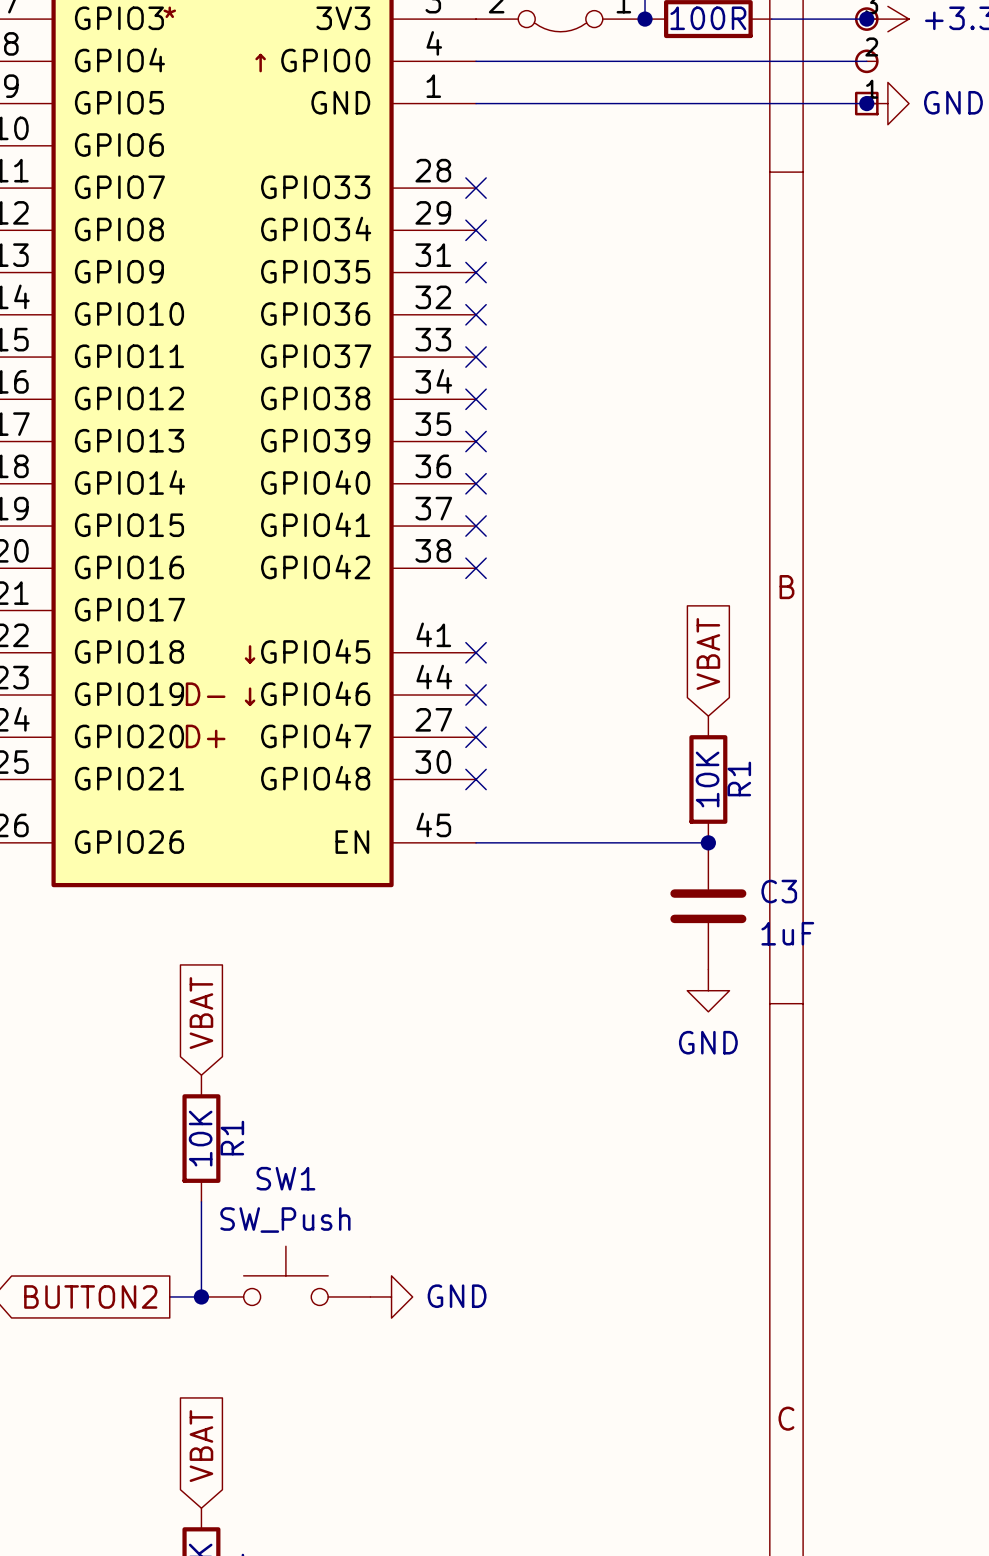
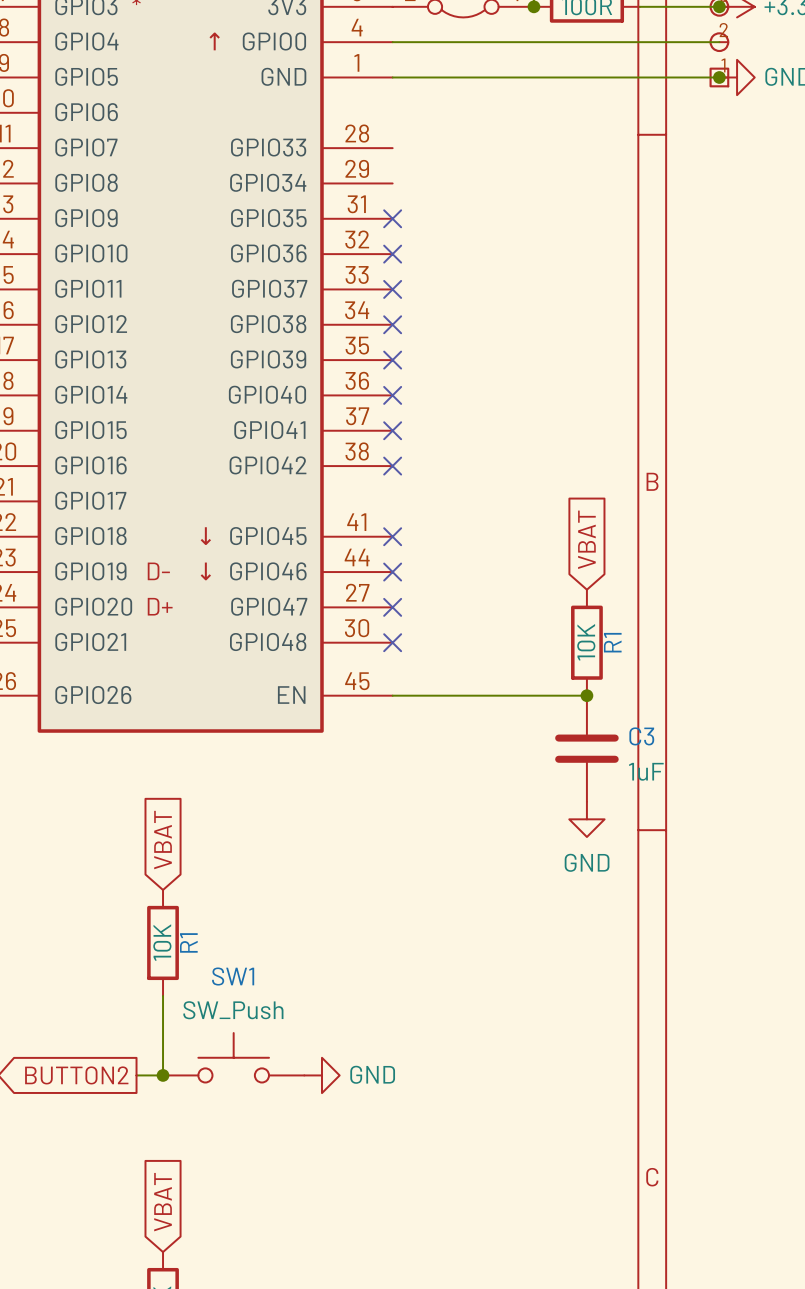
no-connect mark: (476, 188) -> none
no-connect mark: (476, 230) -> none

